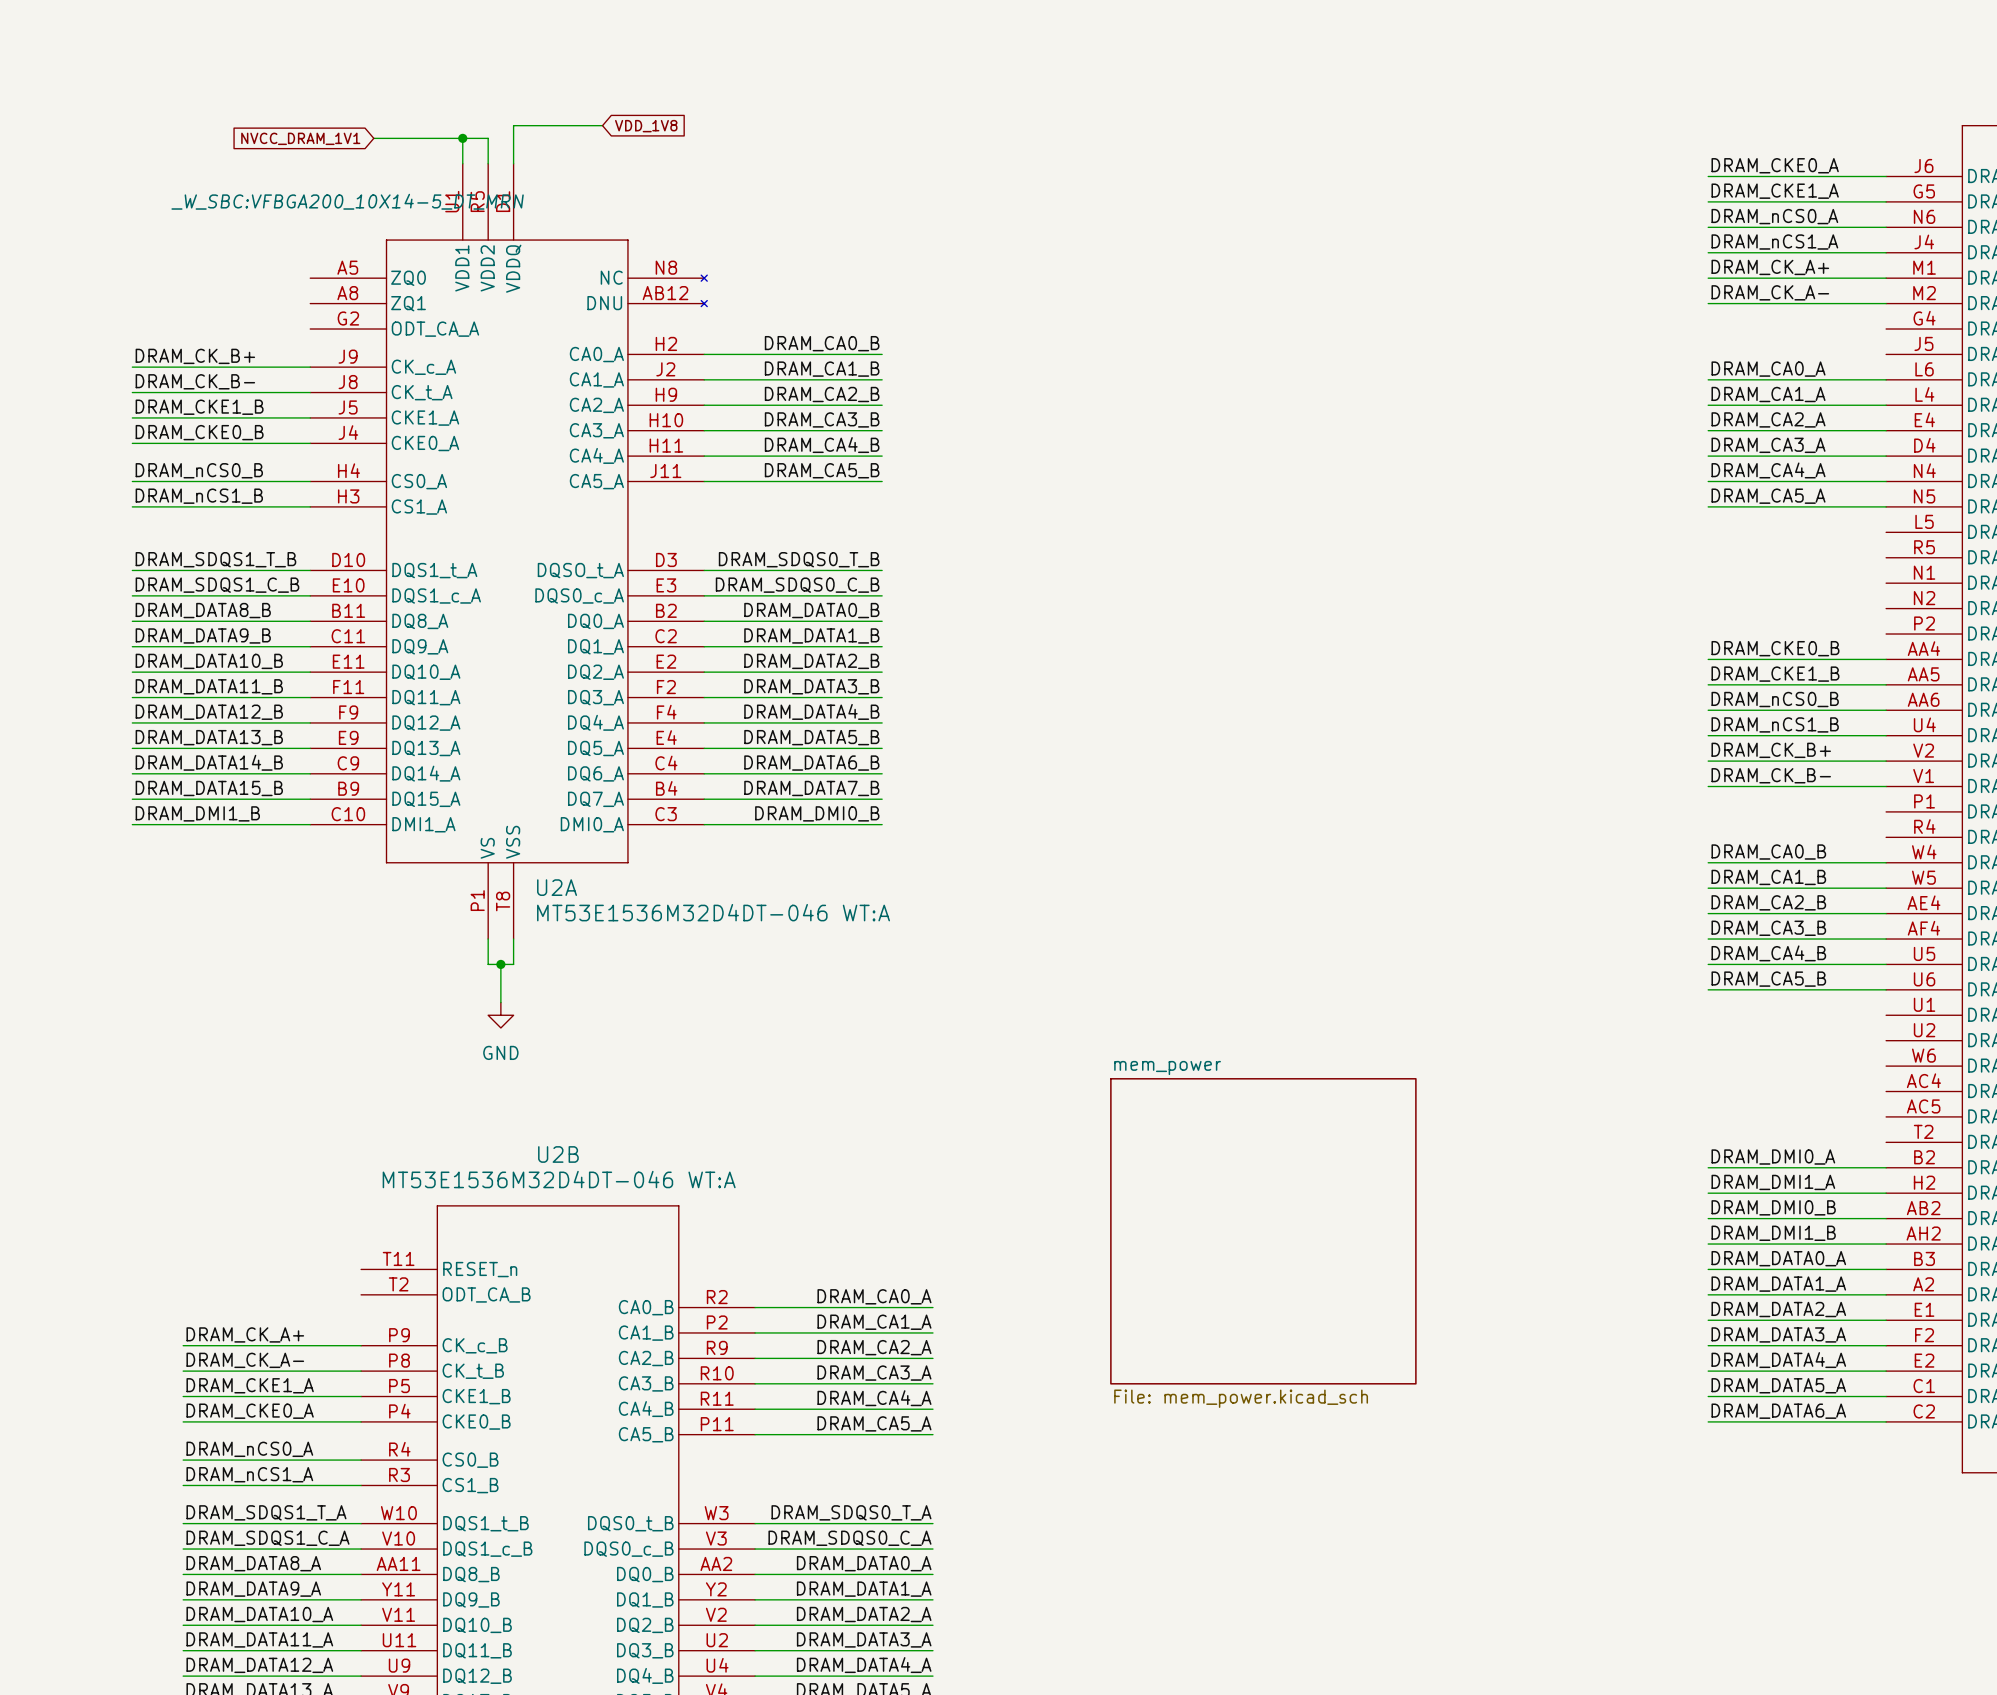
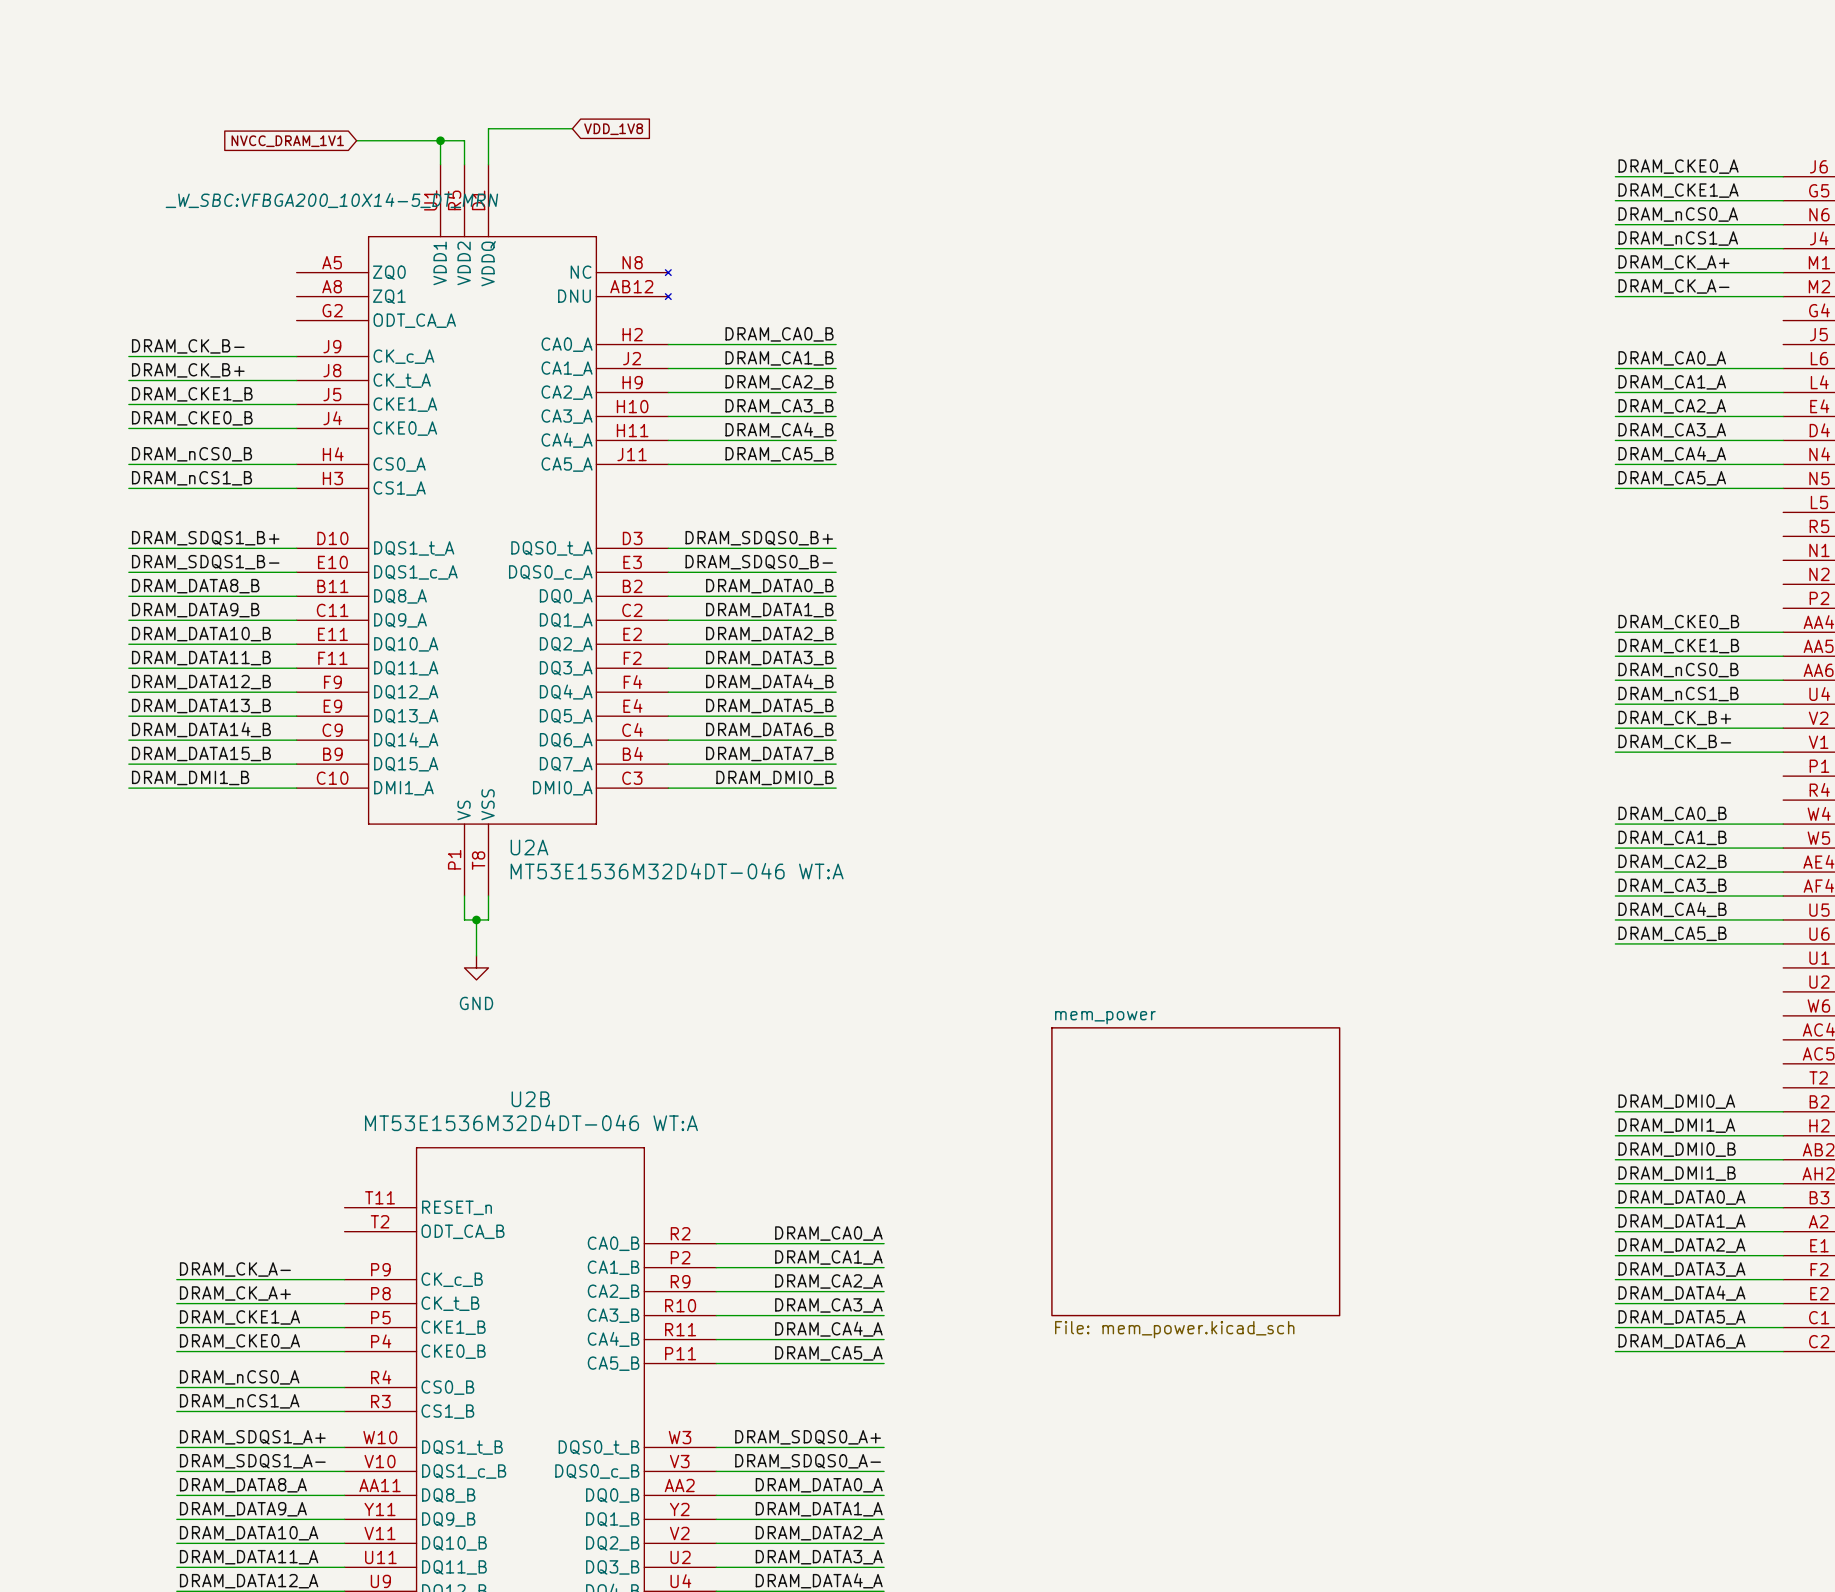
label: DRAM_CK_B+ (195, 356) -> DRAM_CK_B- (188, 346)
label: DRAM_CK_B- (195, 381) -> DRAM_CK_B+ (188, 370)
label: DRAM_SDQS1_T_B (215, 559) -> DRAM_SDQS1_B+ (205, 538)
label: DRAM_SDQS0_T_B (799, 559) -> DRAM_SDQS0_B+ (759, 538)
label: DRAM_SDQS1_C_B (217, 585) -> DRAM_SDQS1_B- (205, 562)
label: DRAM_SDQS0_C_B (797, 585) -> DRAM_SDQS0_B- (759, 562)
label: DRAM_CK_A+ (245, 1334) -> DRAM_CK_A- (235, 1269)
label: DRAM_CK_A- (245, 1360) -> DRAM_CK_A+ (235, 1293)
label: DRAM_SDQS1_T_A (266, 1512) -> DRAM_SDQS1_A+ (252, 1437)
label: DRAM_SDQS0_T_A (851, 1512) -> DRAM_SDQS0_A+ (808, 1437)
label: DRAM_SDQS1_C_A (267, 1538) -> DRAM_SDQS1_A- (252, 1461)
label: DRAM_SDQS0_C_A (849, 1538) -> DRAM_SDQS0_A- (808, 1461)

